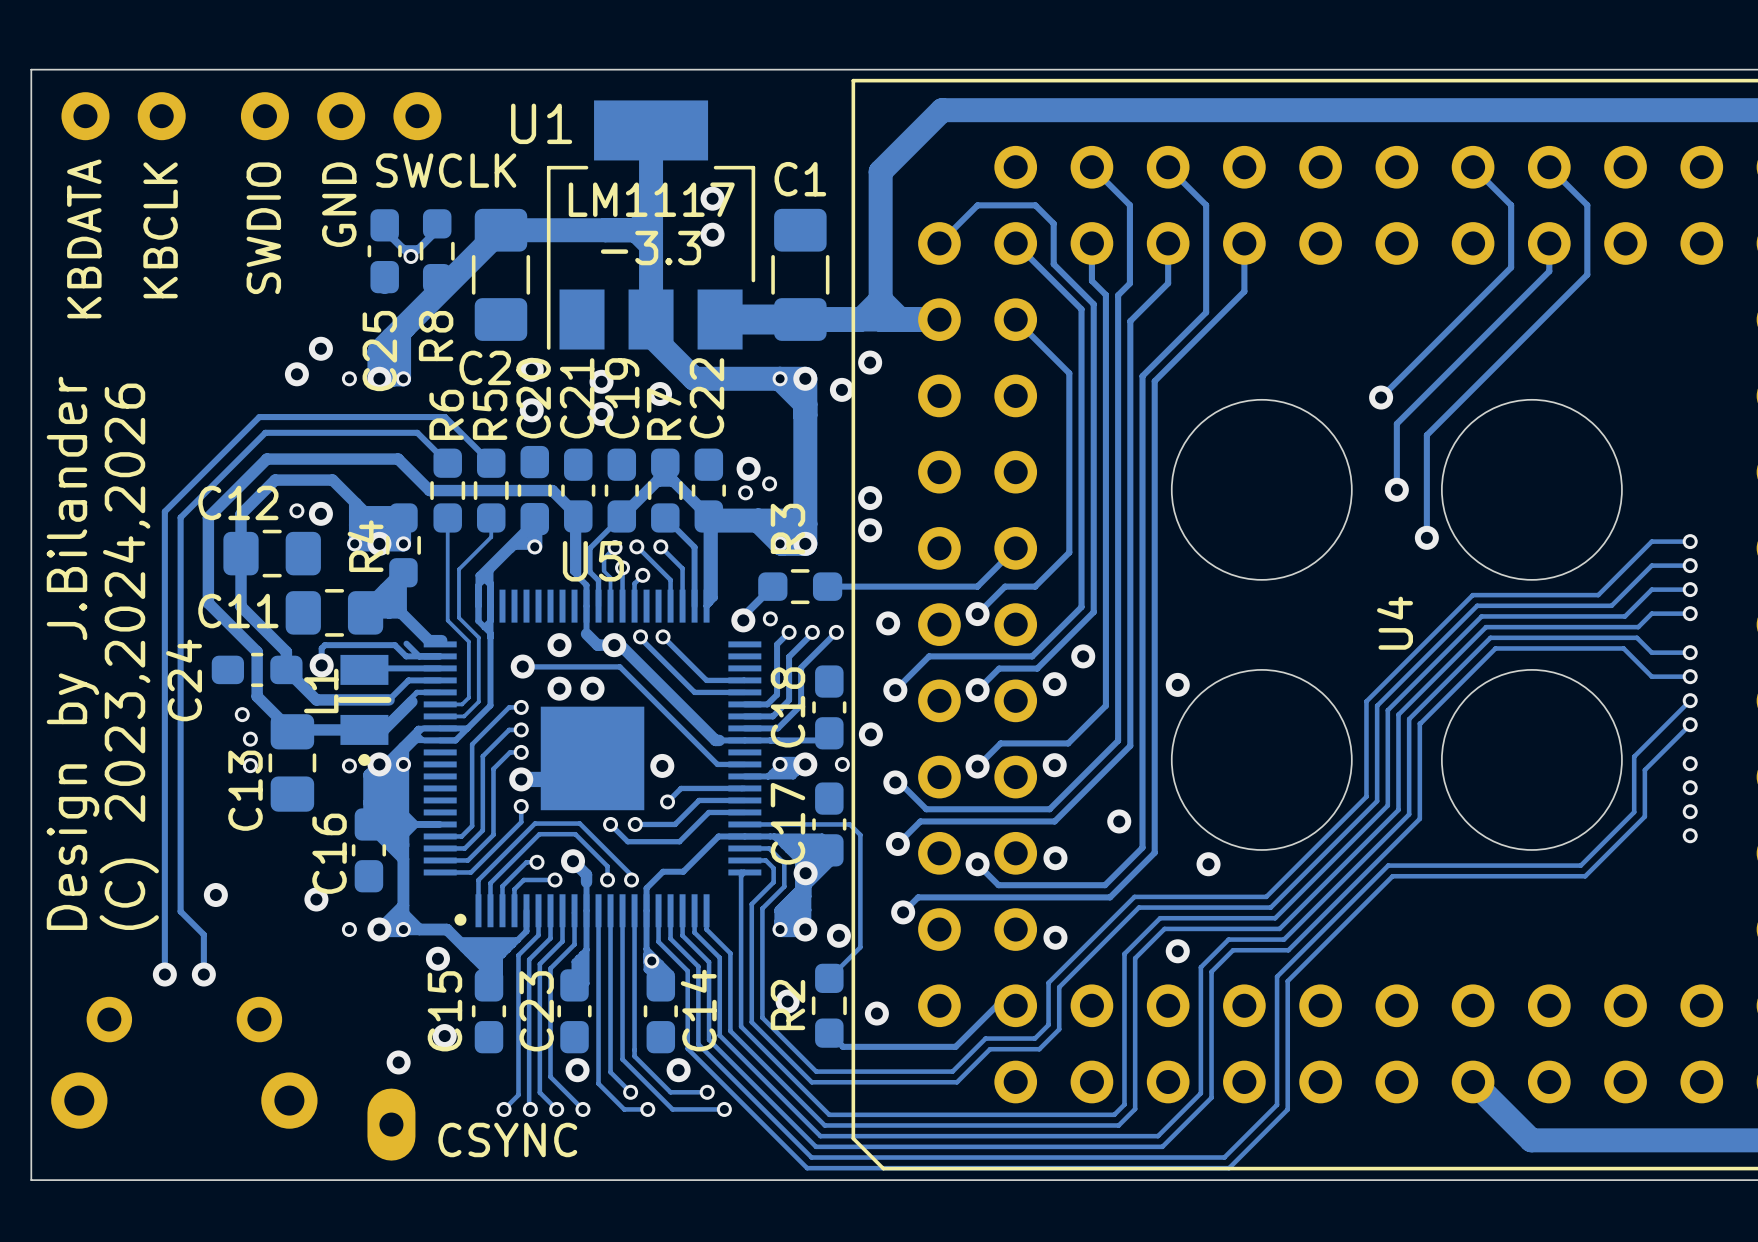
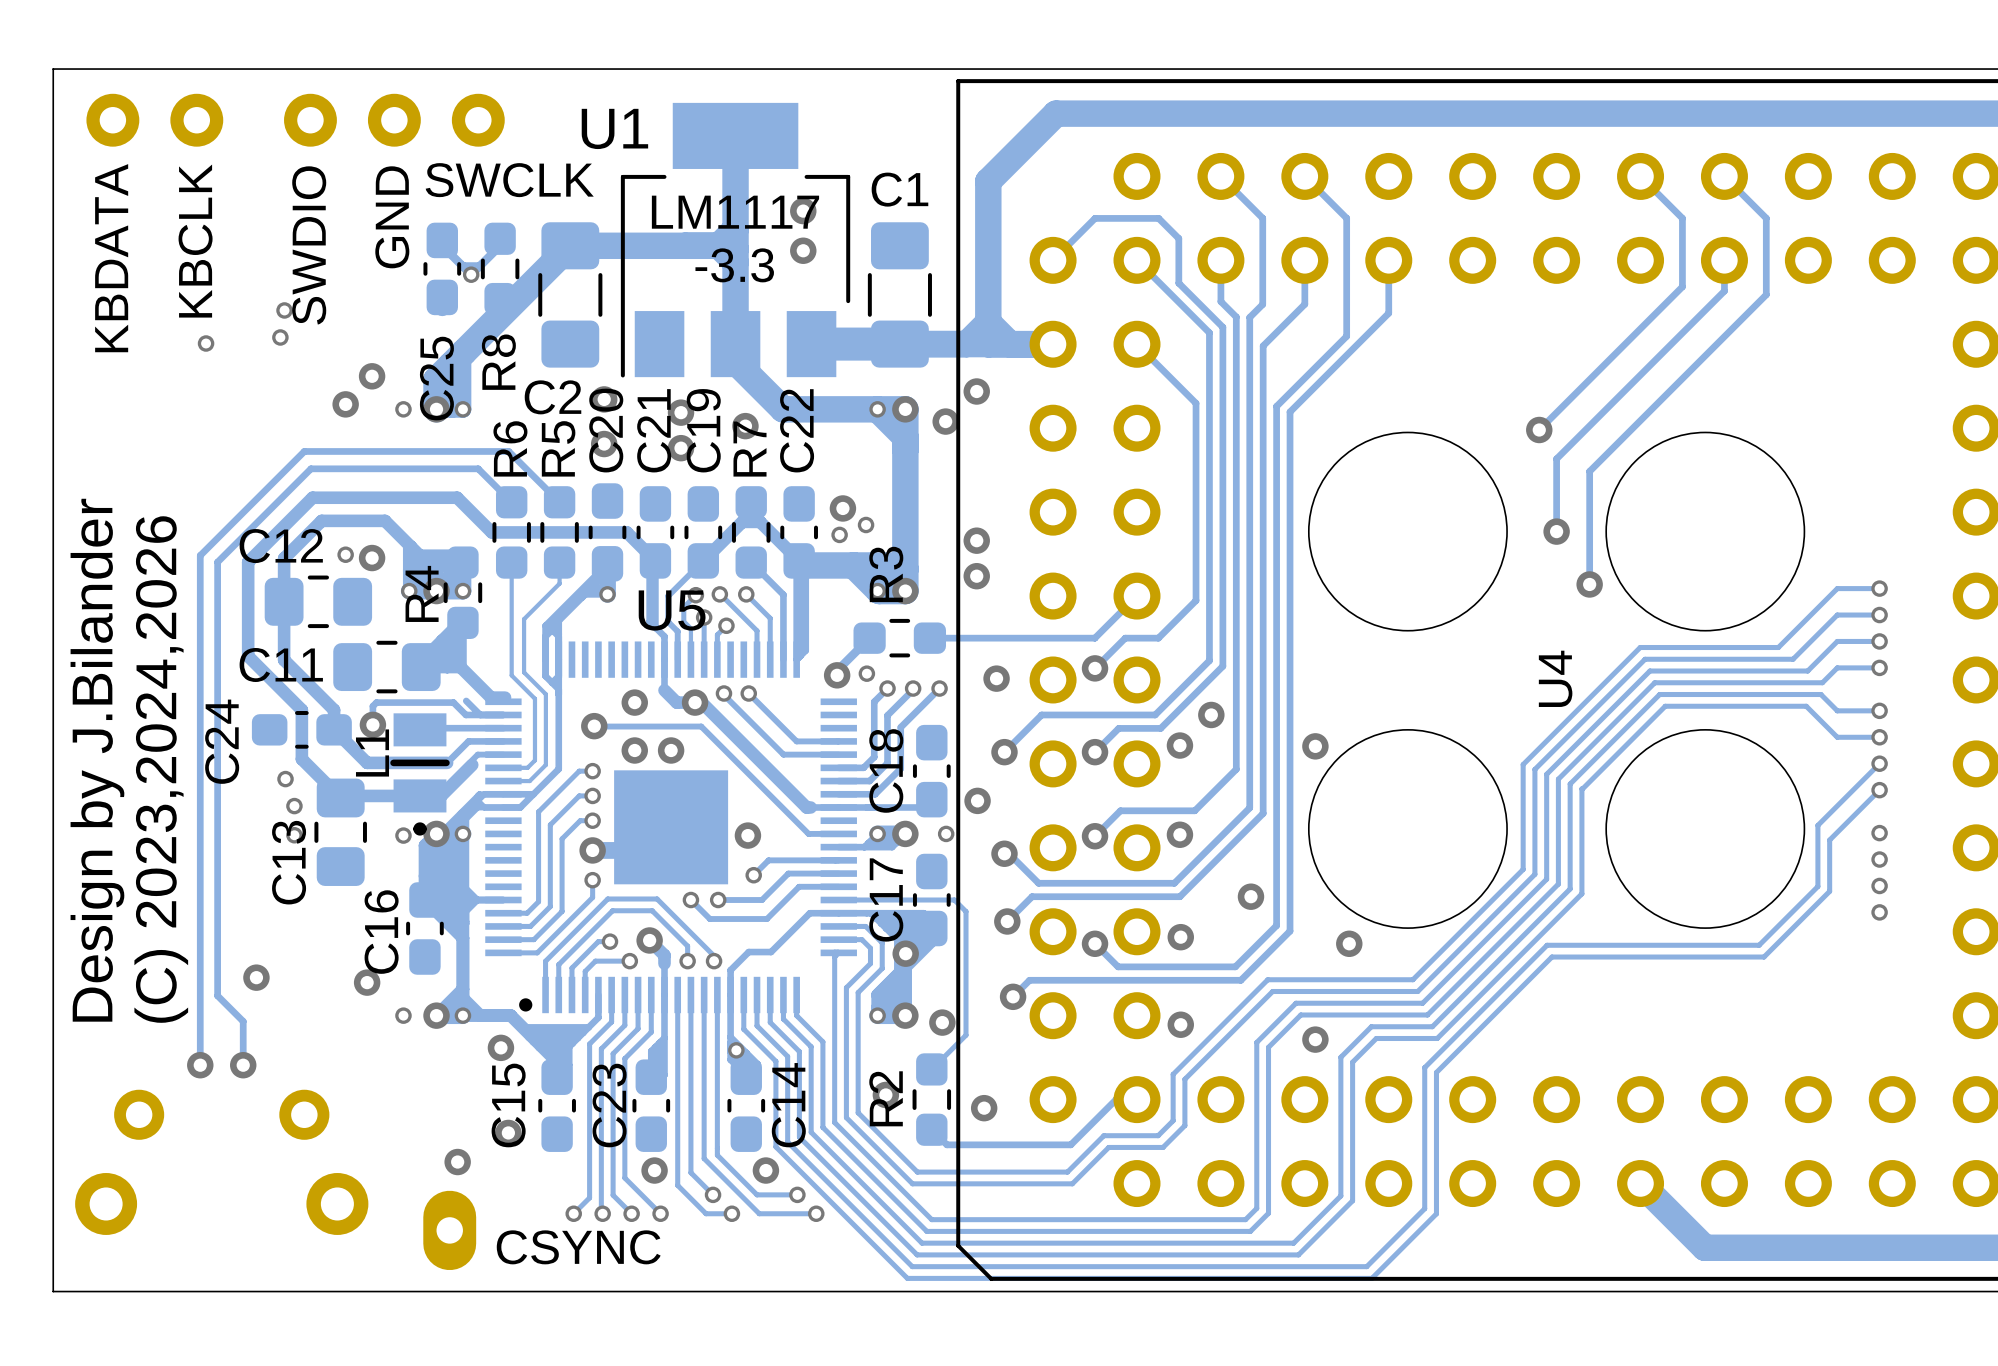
via: none -> (284, 310)
via: none -> (280, 337)
via: none -> (206, 343)

